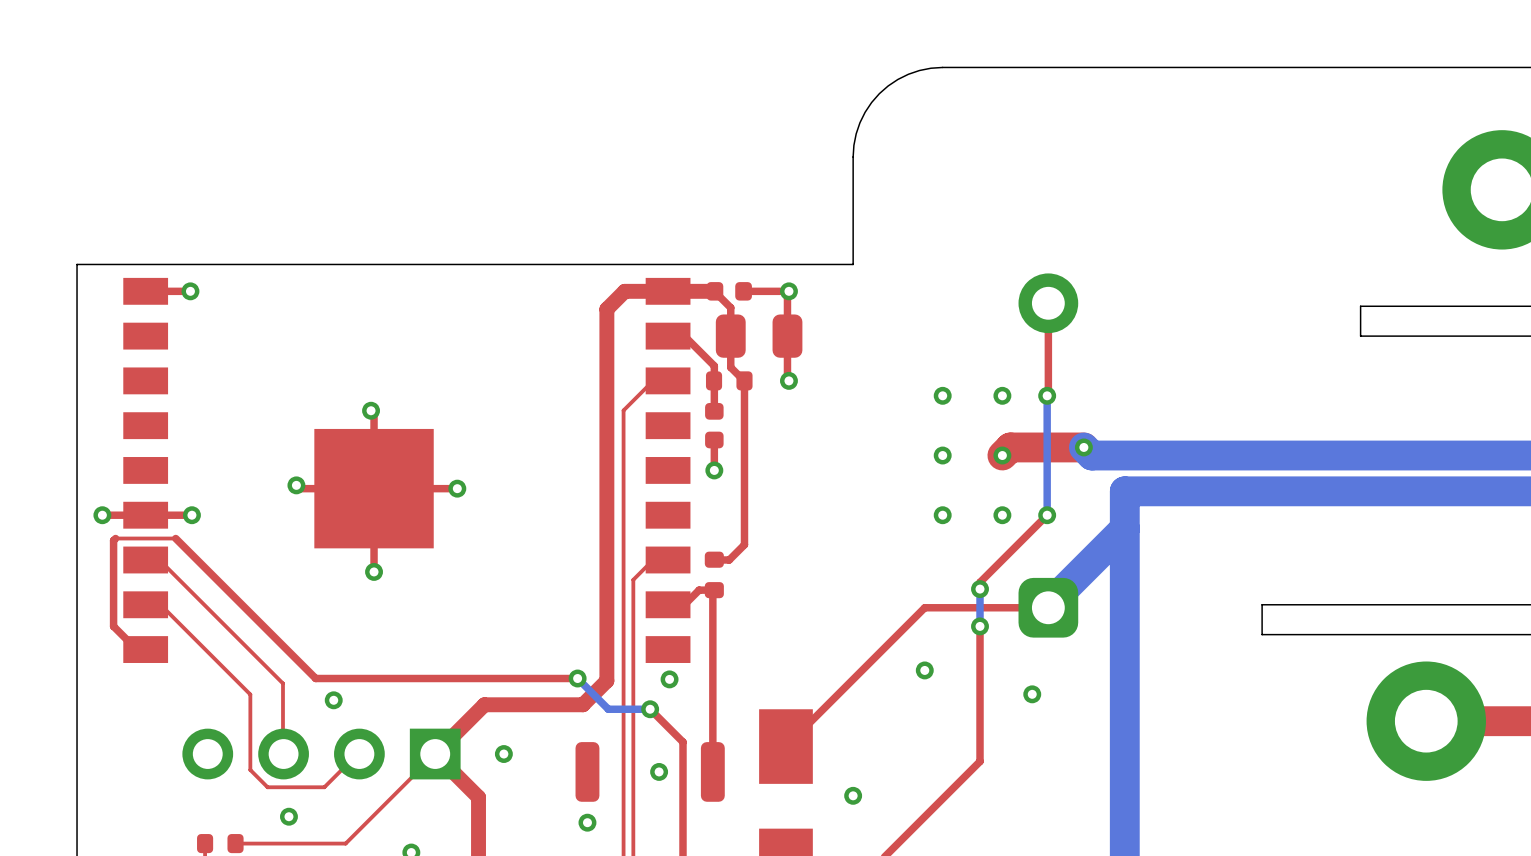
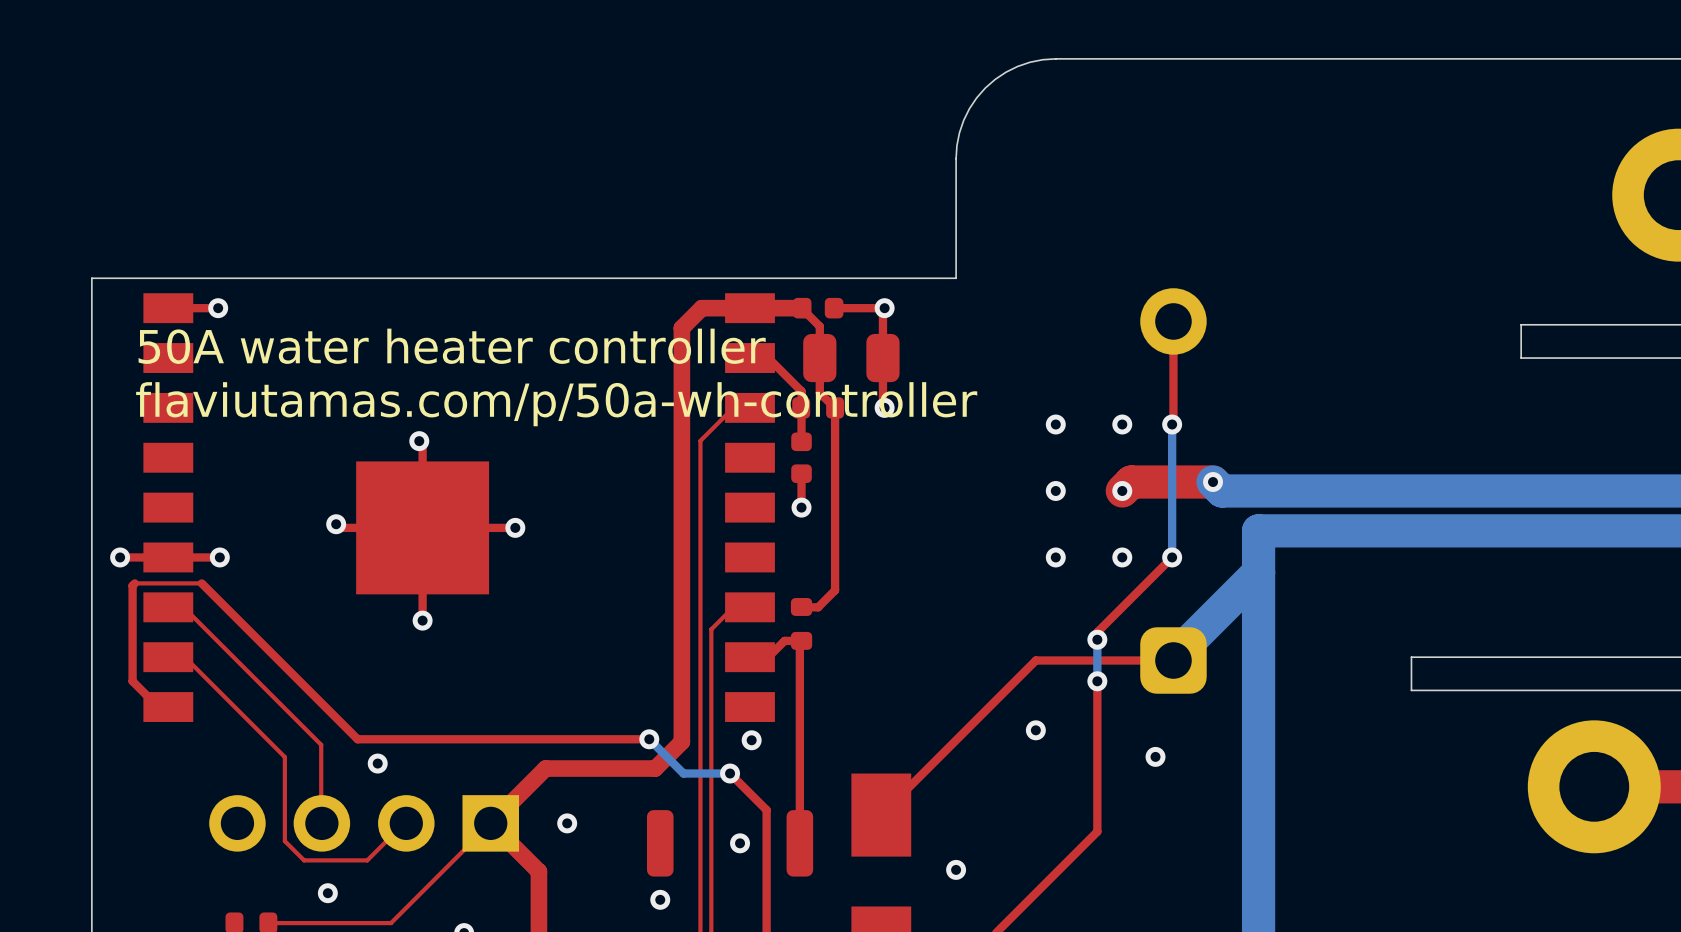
text: none -> 50A water heater controller (452, 346)
text: none -> flaviutamas.com/p/50a-wh-controller (556, 404)

